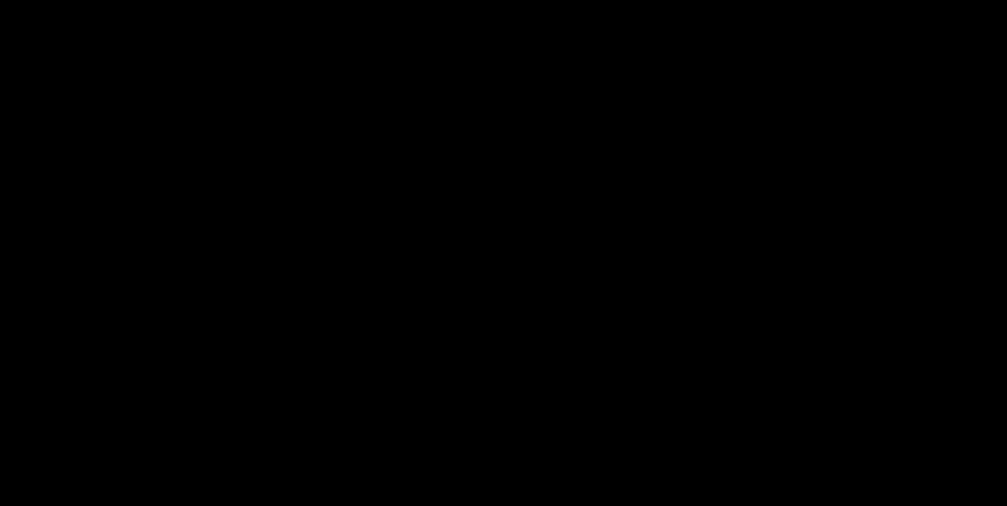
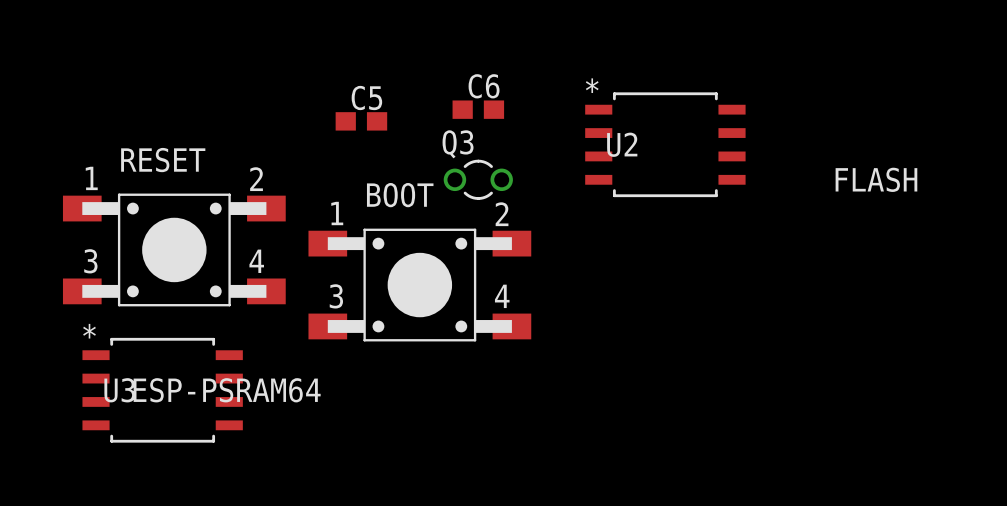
C6: none -> (478, 109)
C5: none -> (361, 121)
U2: none -> FLASH (665, 144)
Q3: none -> (478, 179)
RESET: none -> (174, 249)
BOOT: none -> (419, 285)
U3: none -> ESP-PSRAM64 (162, 390)

